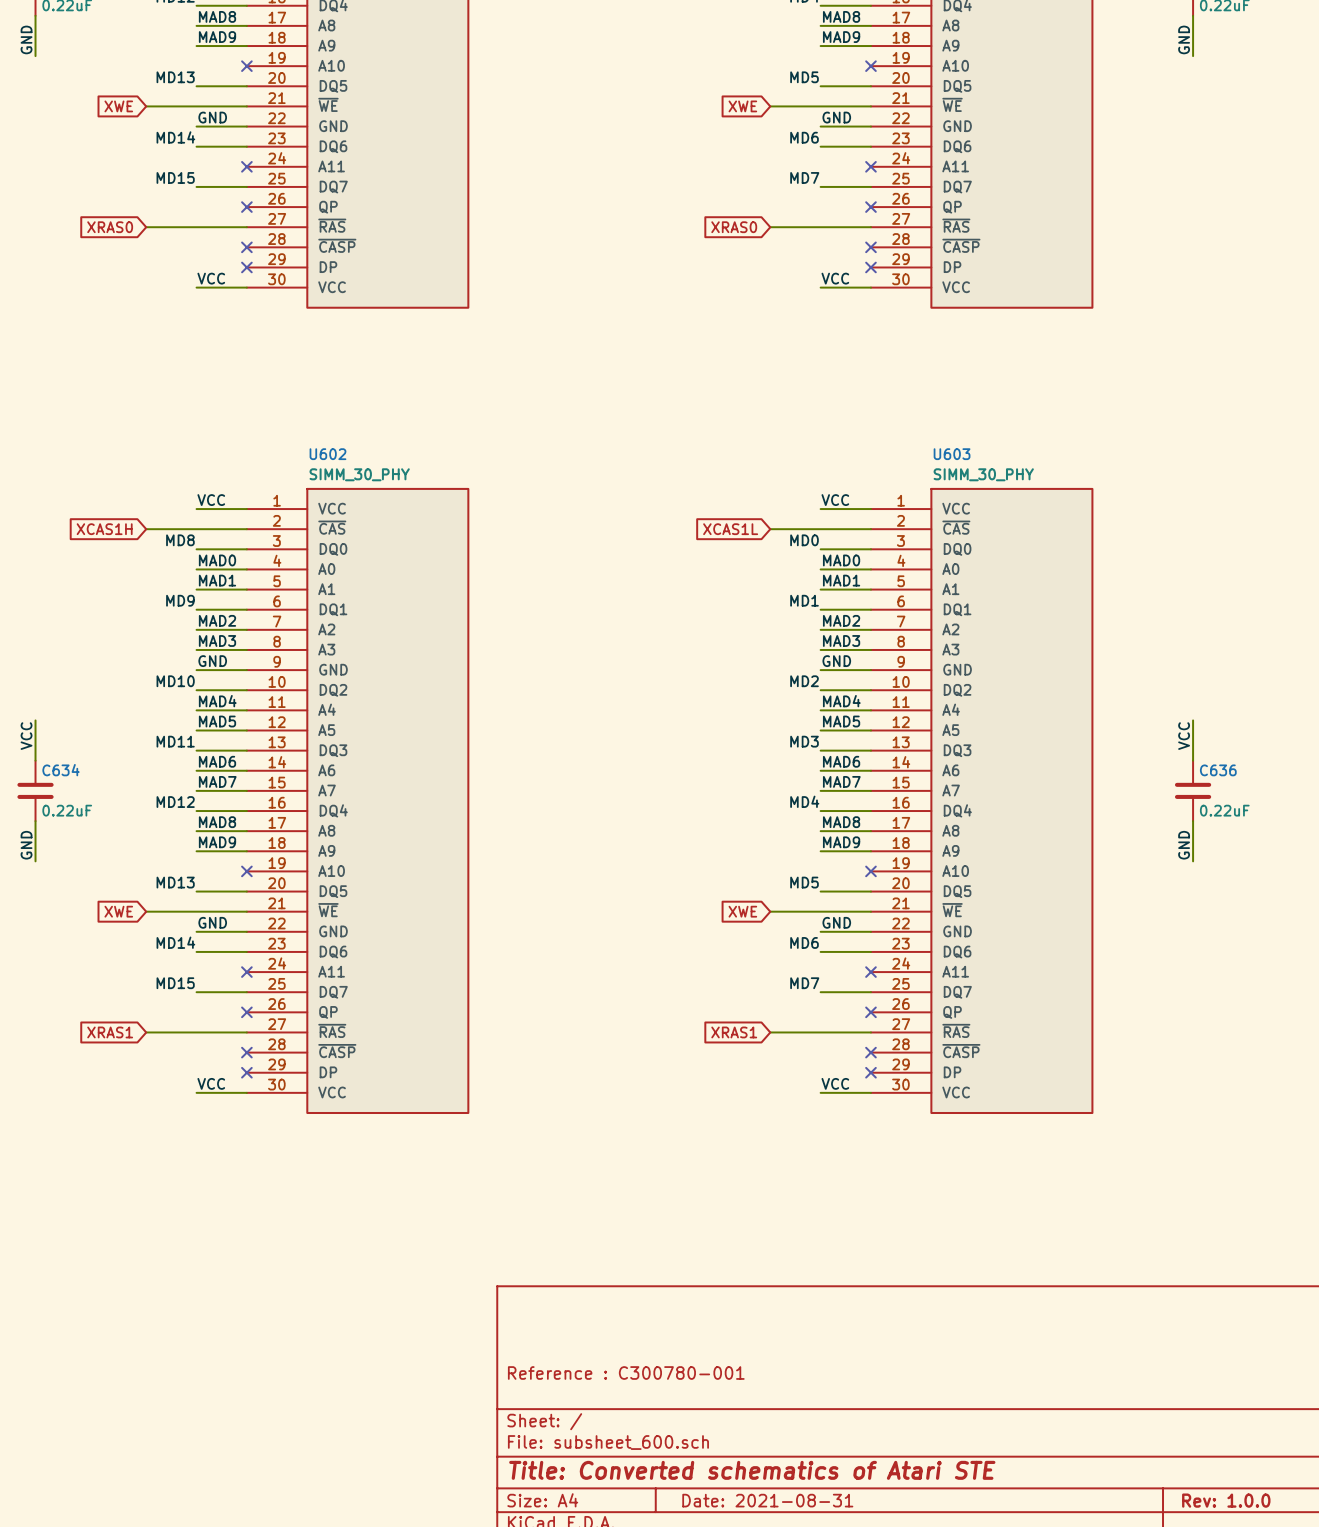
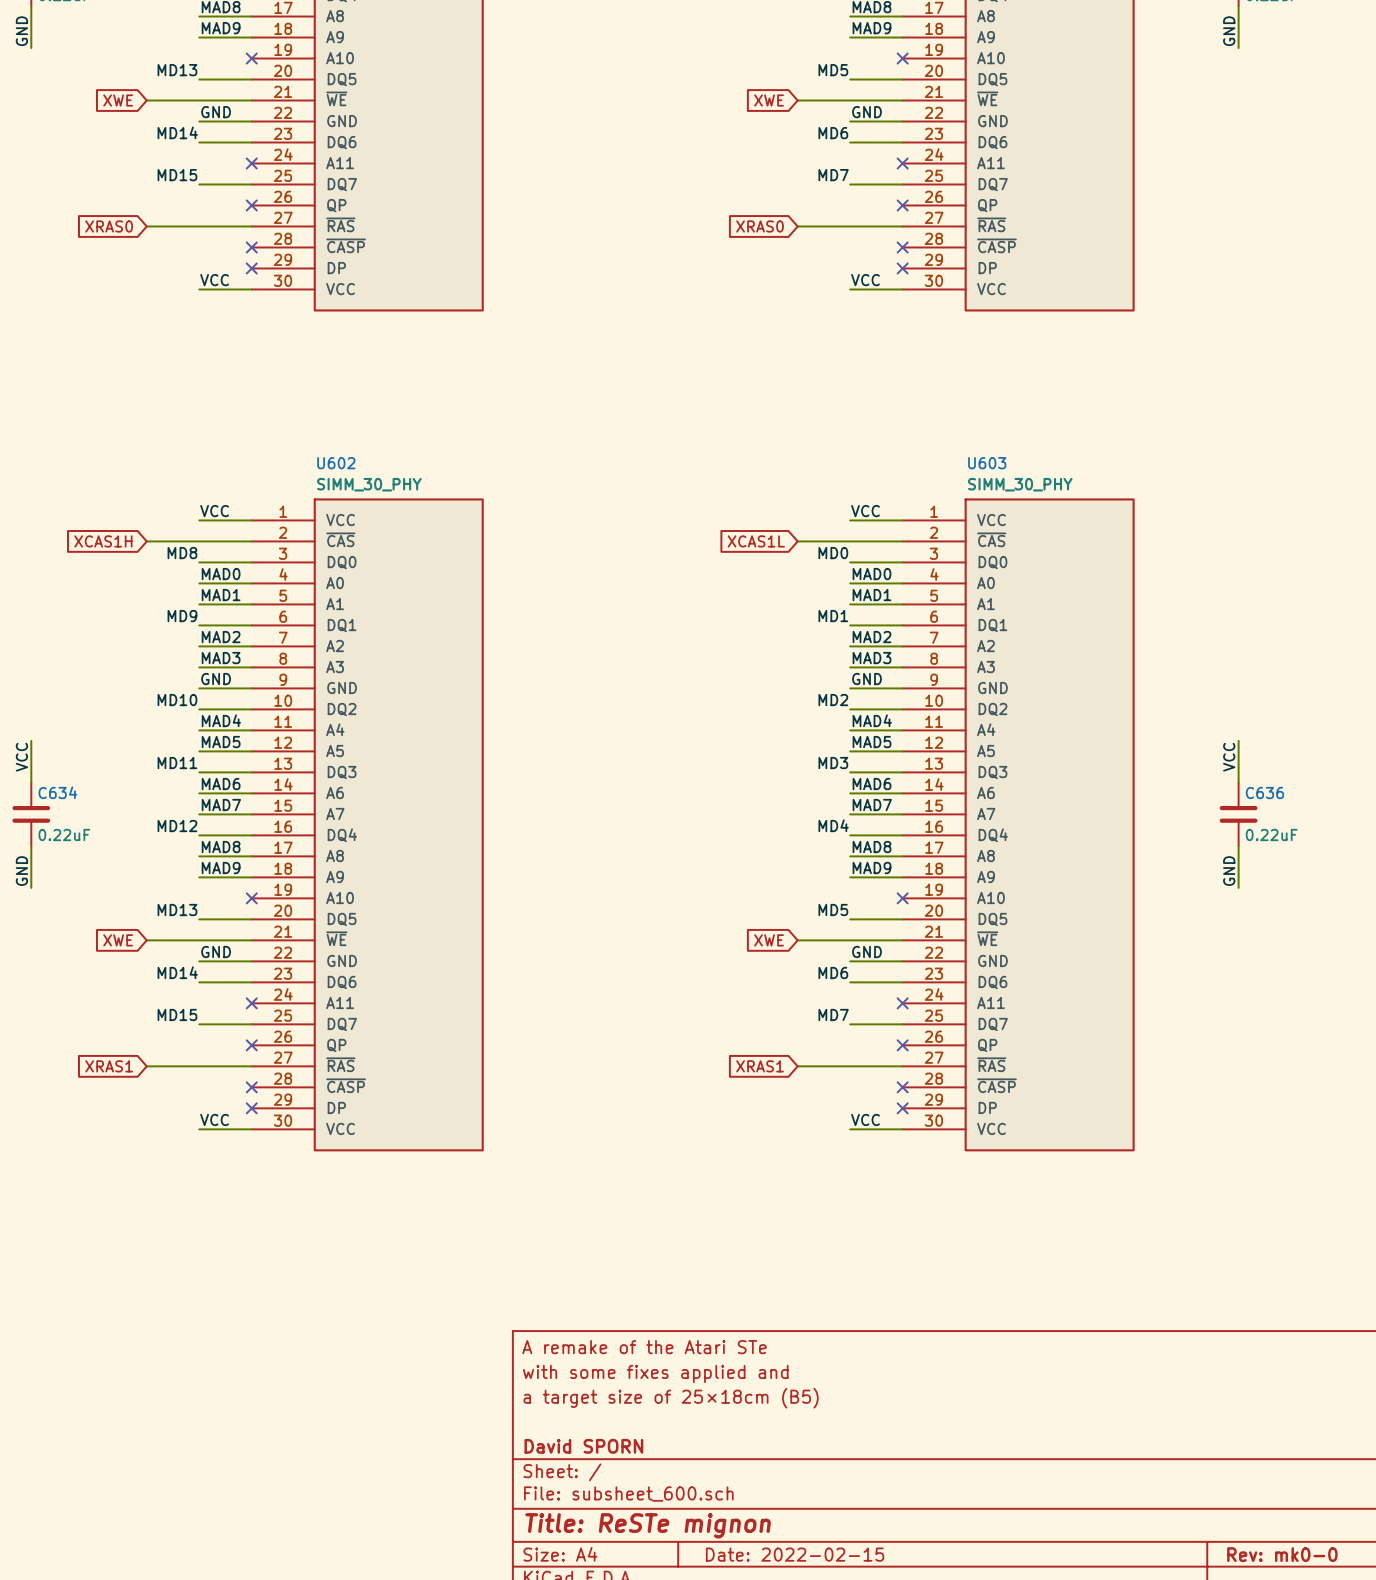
title block: none -> A remake of the Atari STe (644, 1347)
title block: none -> with some fixes applied and (655, 1373)
title block: none -> a target size of 25×18cm (B5) (671, 1398)
title block: Reference : C300780-001 (626, 1373) -> none
title block: none -> David SPORN (583, 1446)
title block: Title: Converted schematics of Atari STE (752, 1470) -> Title: ReSTe mignon (648, 1525)
title block: Date: 2021-08-31 (767, 1500) -> Date: 2022-02-15 (795, 1554)
title block: Rev: 1.0.0 (1226, 1500) -> Rev: mk0-0 (1282, 1554)

